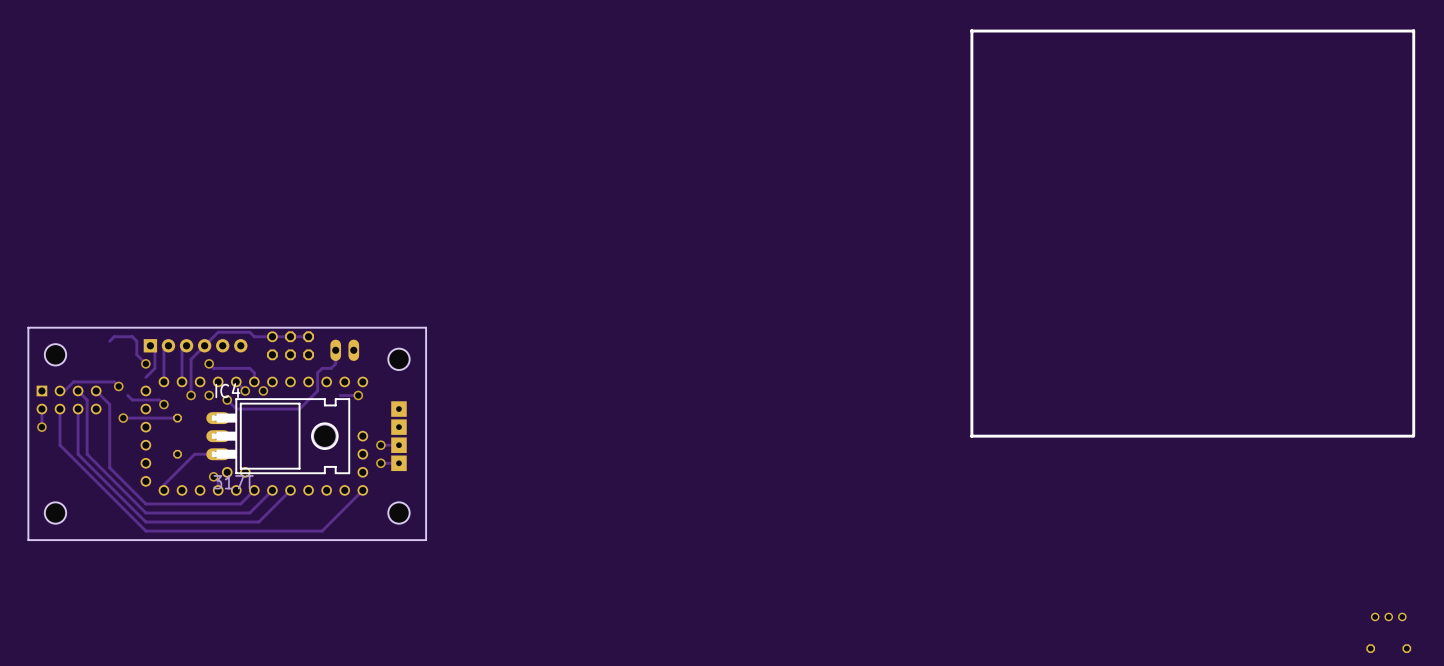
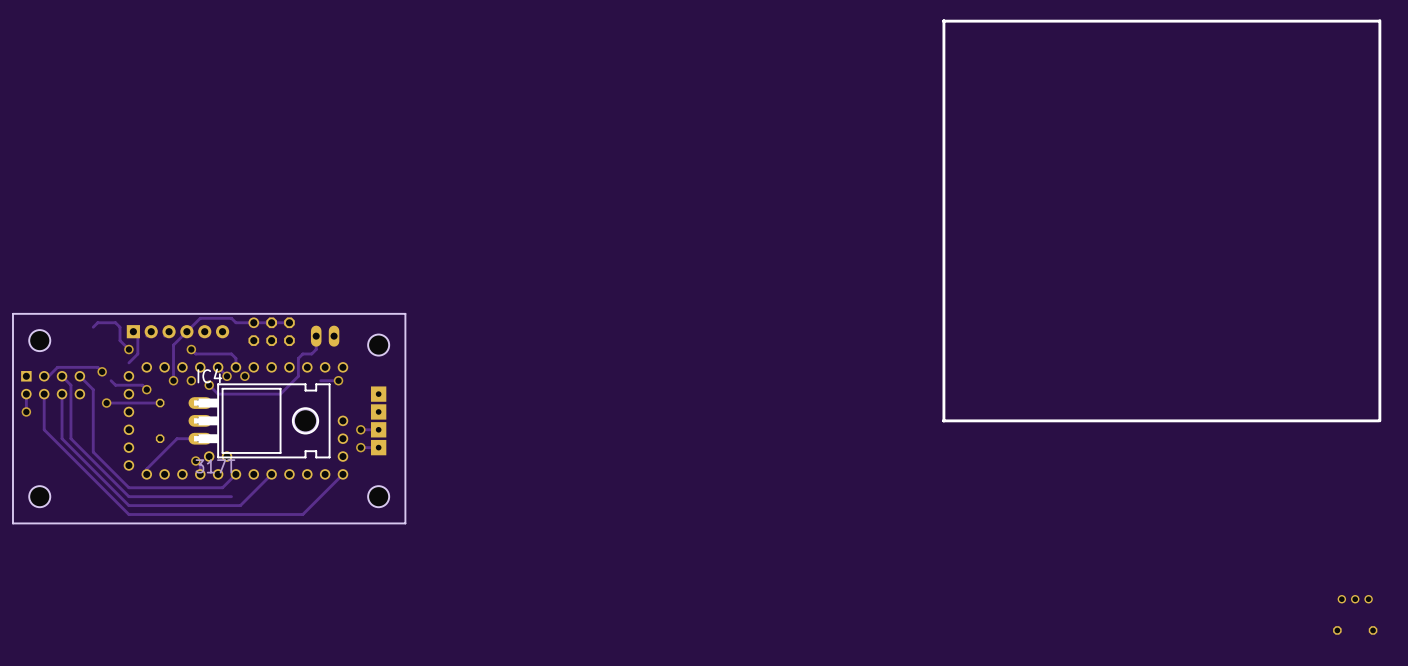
track: (163, 350) (163, 381) -> none
track: (182, 350) (182, 381) -> none
track: (272, 490) (249, 512) -> none

